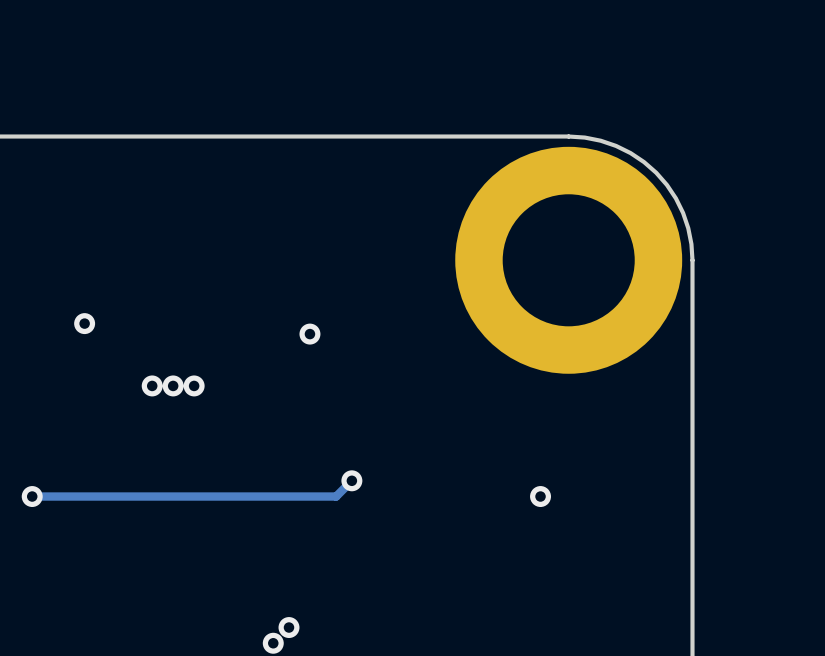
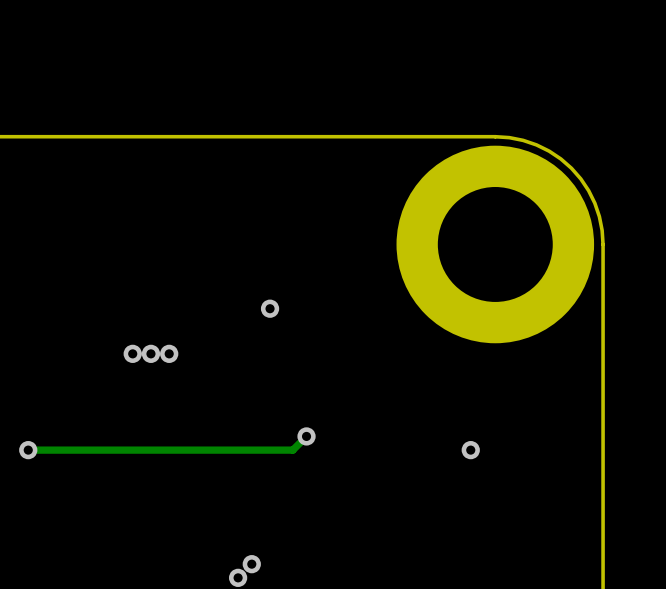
via: (84, 323) -> none

